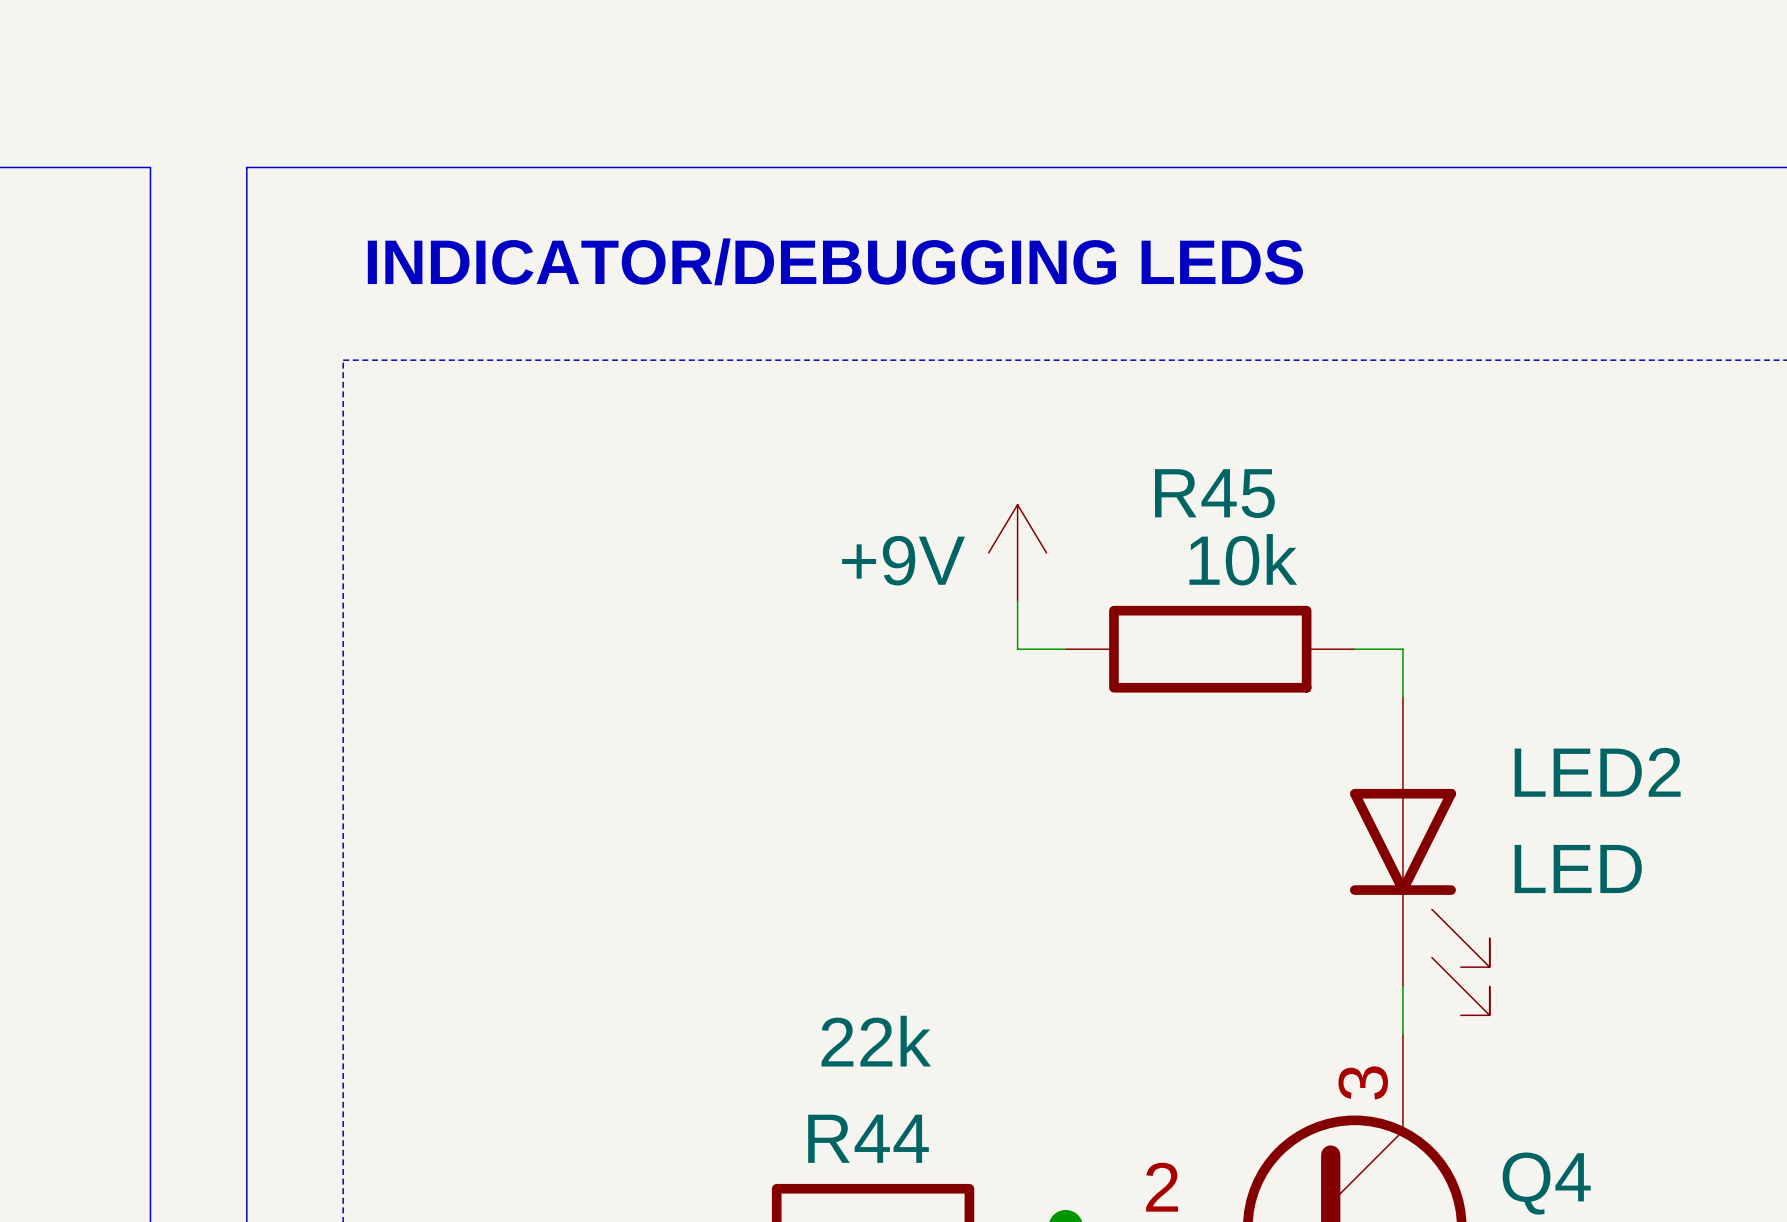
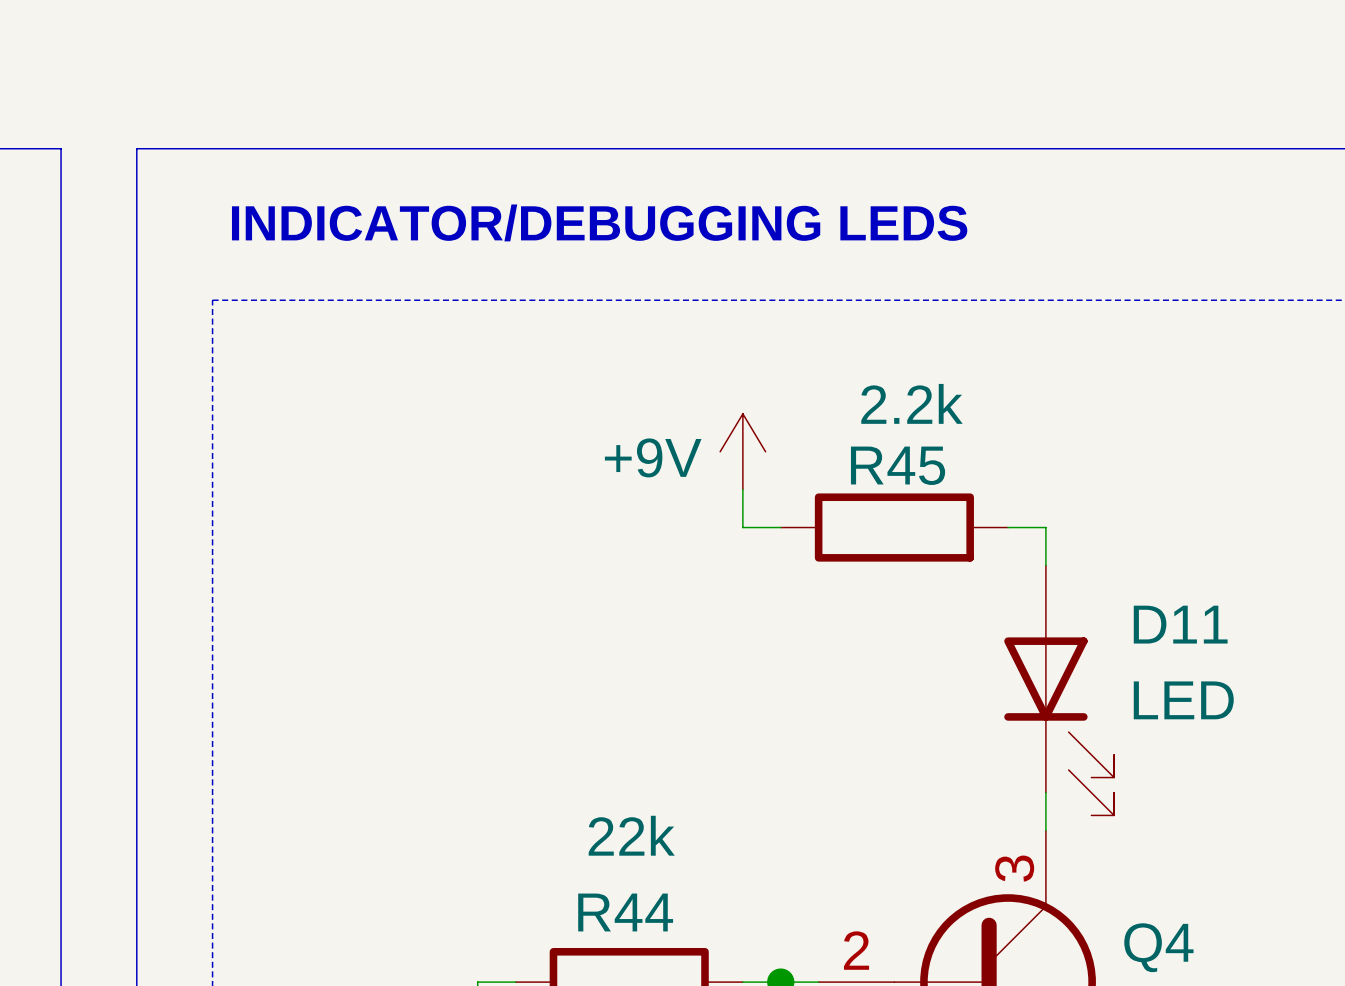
R45 name position: R45 (1214, 493) -> R45 (898, 465)
R45 value: 10k (1243, 559) -> 2.2k (911, 403)
LED2 name: LED2 (1597, 772) -> D11 (1180, 624)

